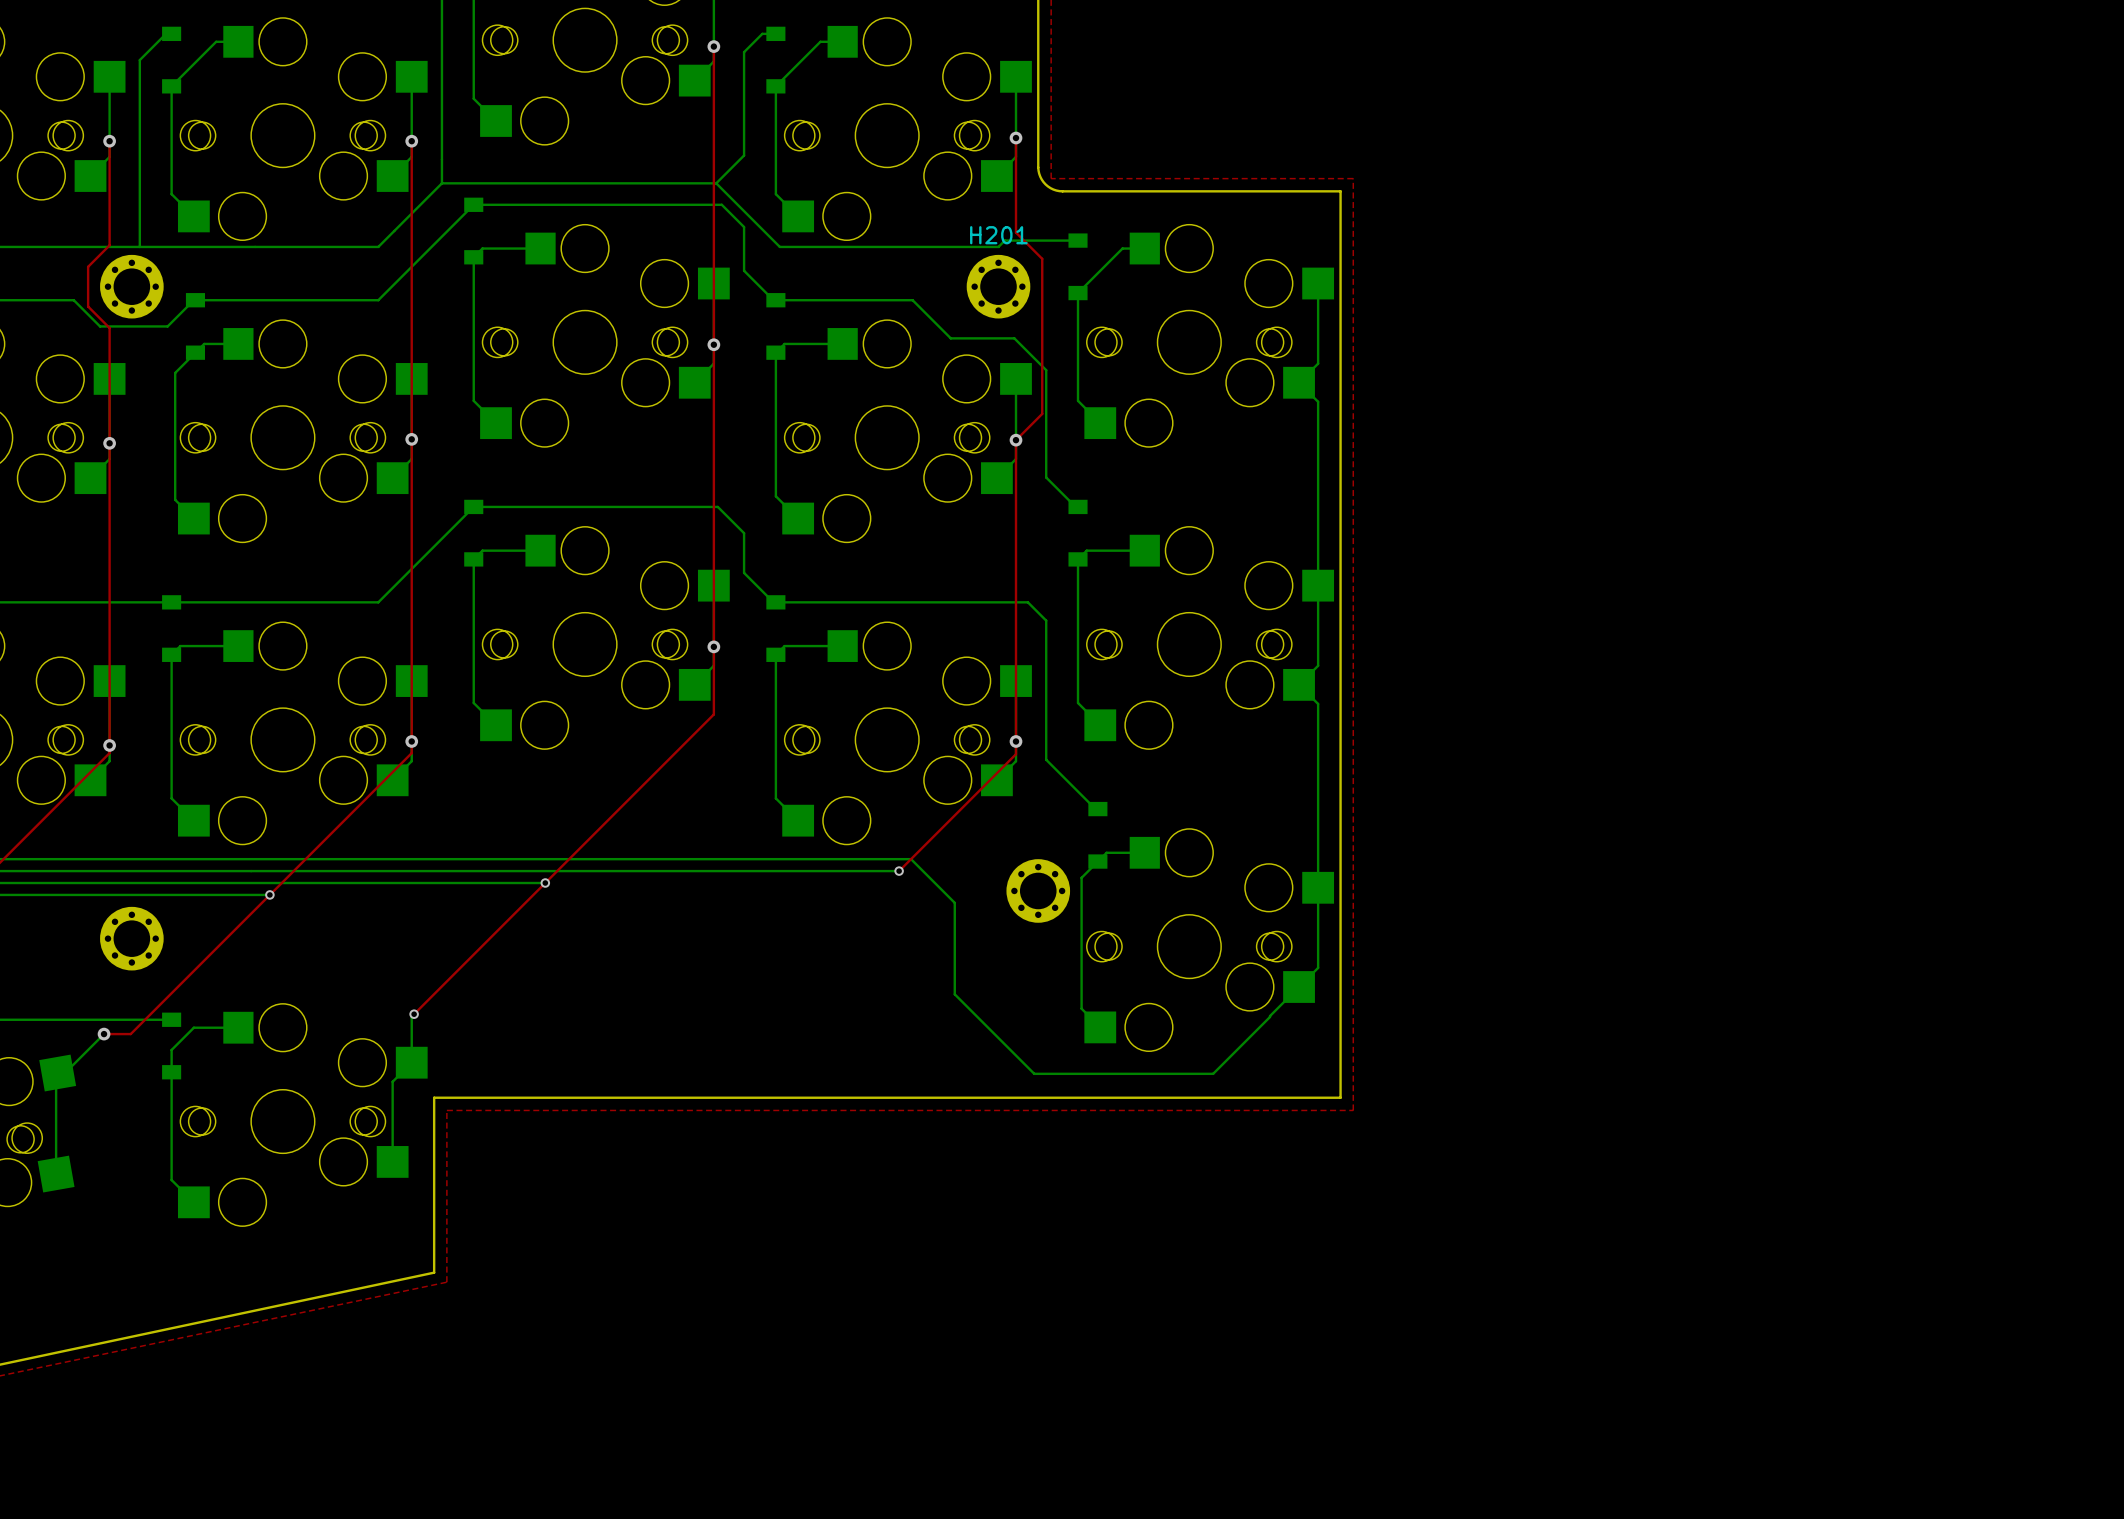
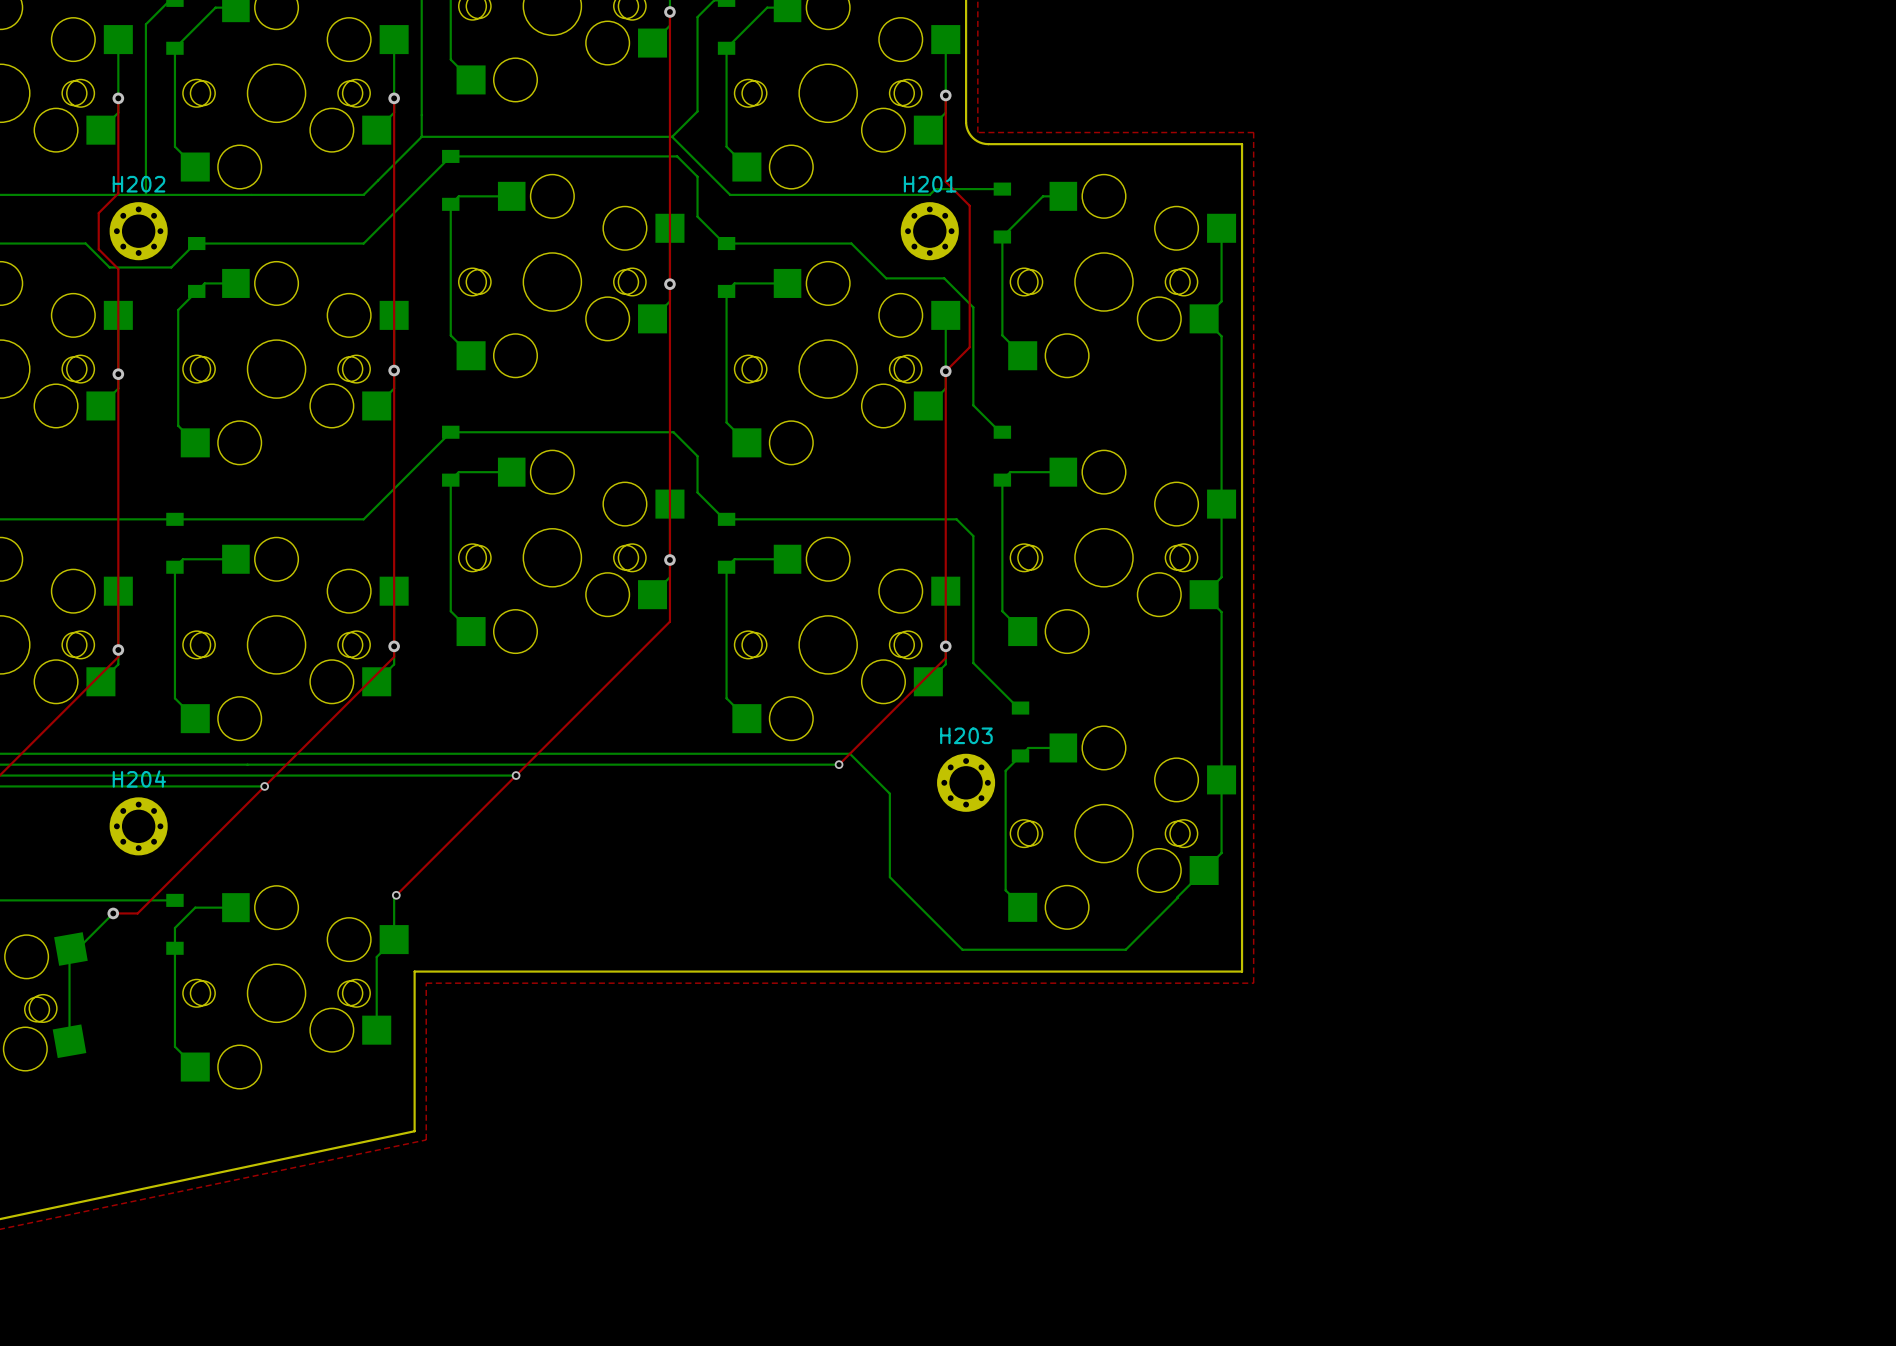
H202 name: none -> H202 (139, 184)
H203 name: none -> H203 (966, 735)
H204 name: none -> H204 (139, 779)

